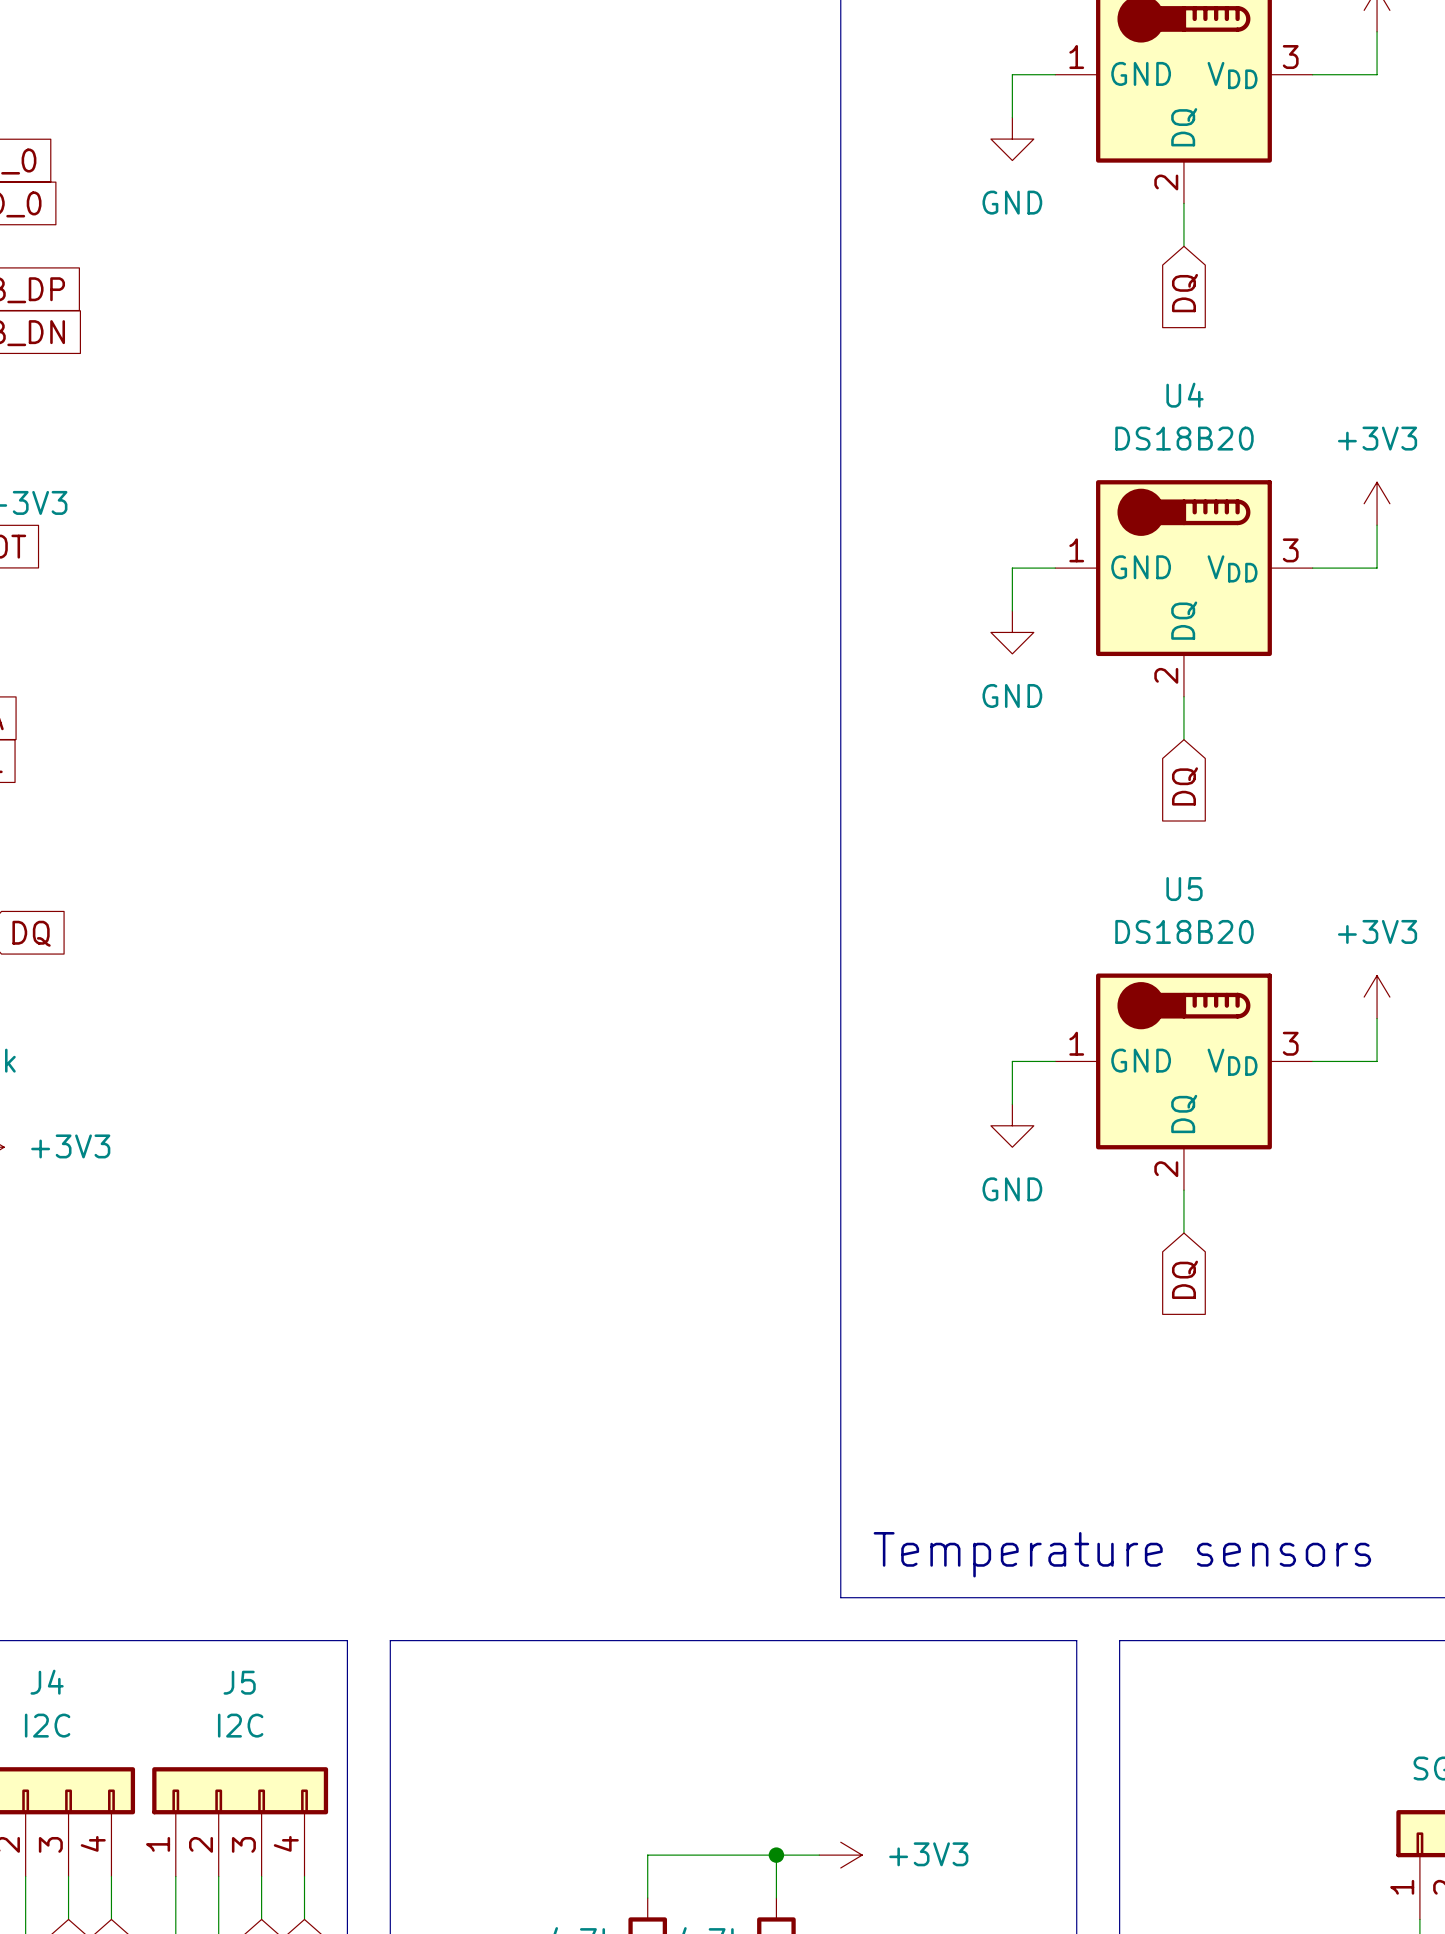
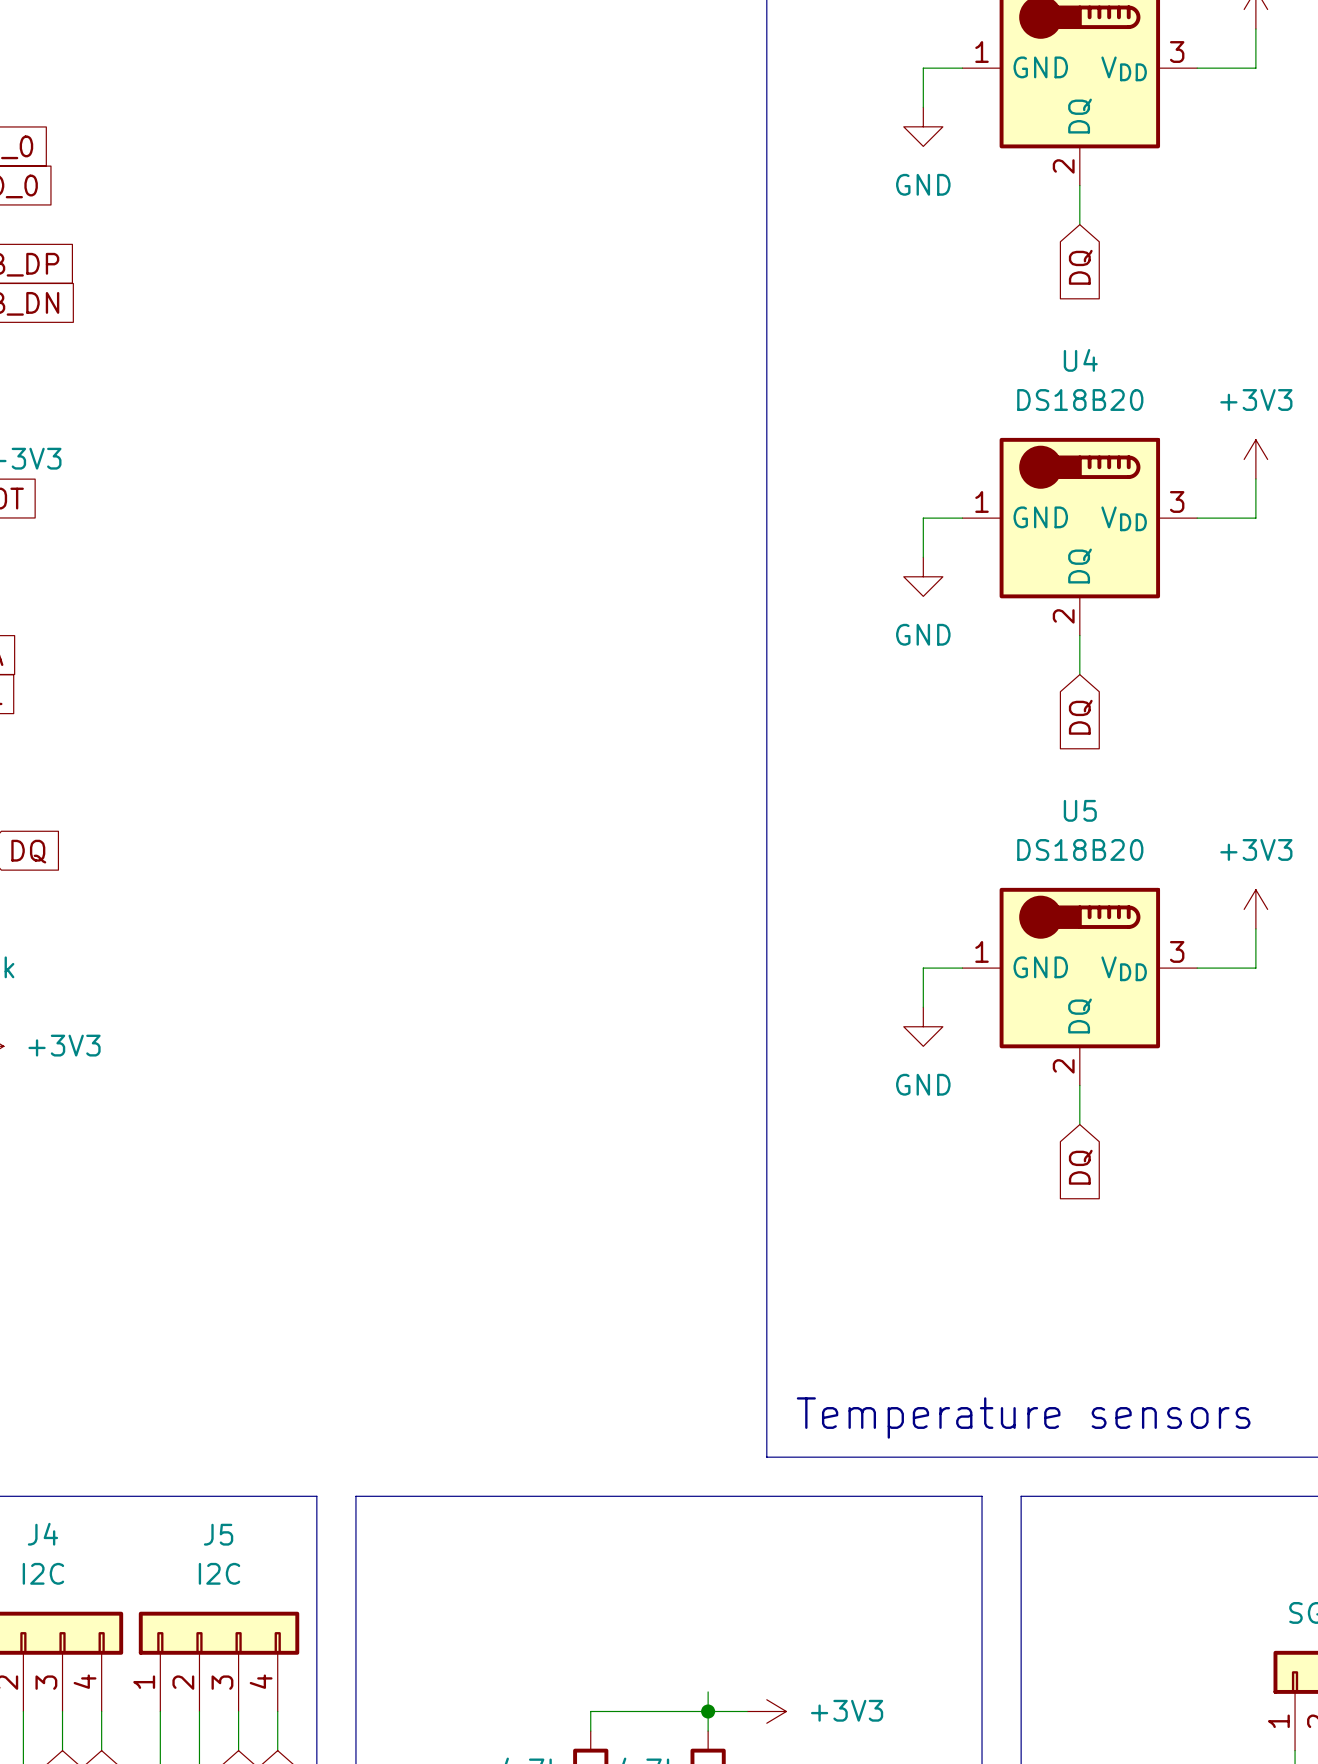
junction position: (776, 1855) -> (708, 1711)
wire: (819, 1855) (647, 1855) (647, 1876) -> (747, 1711) (590, 1711)
power symbol position: +3V3 (840, 1855) -> +3V3 (766, 1711)

